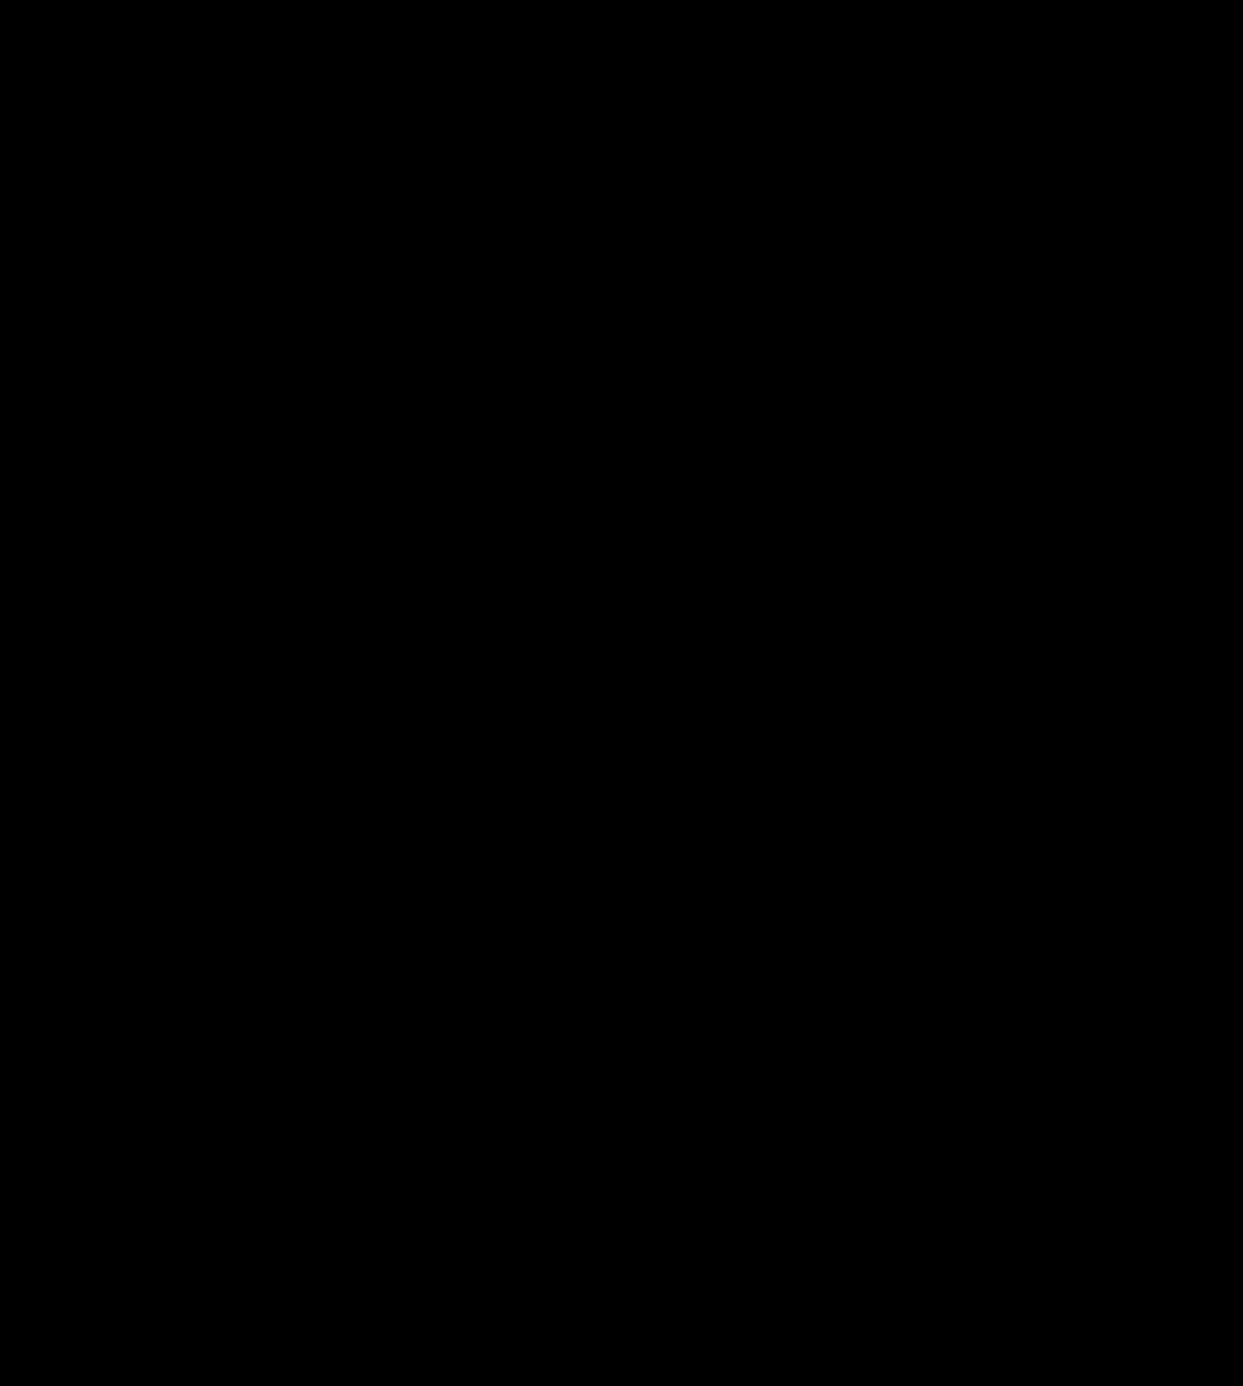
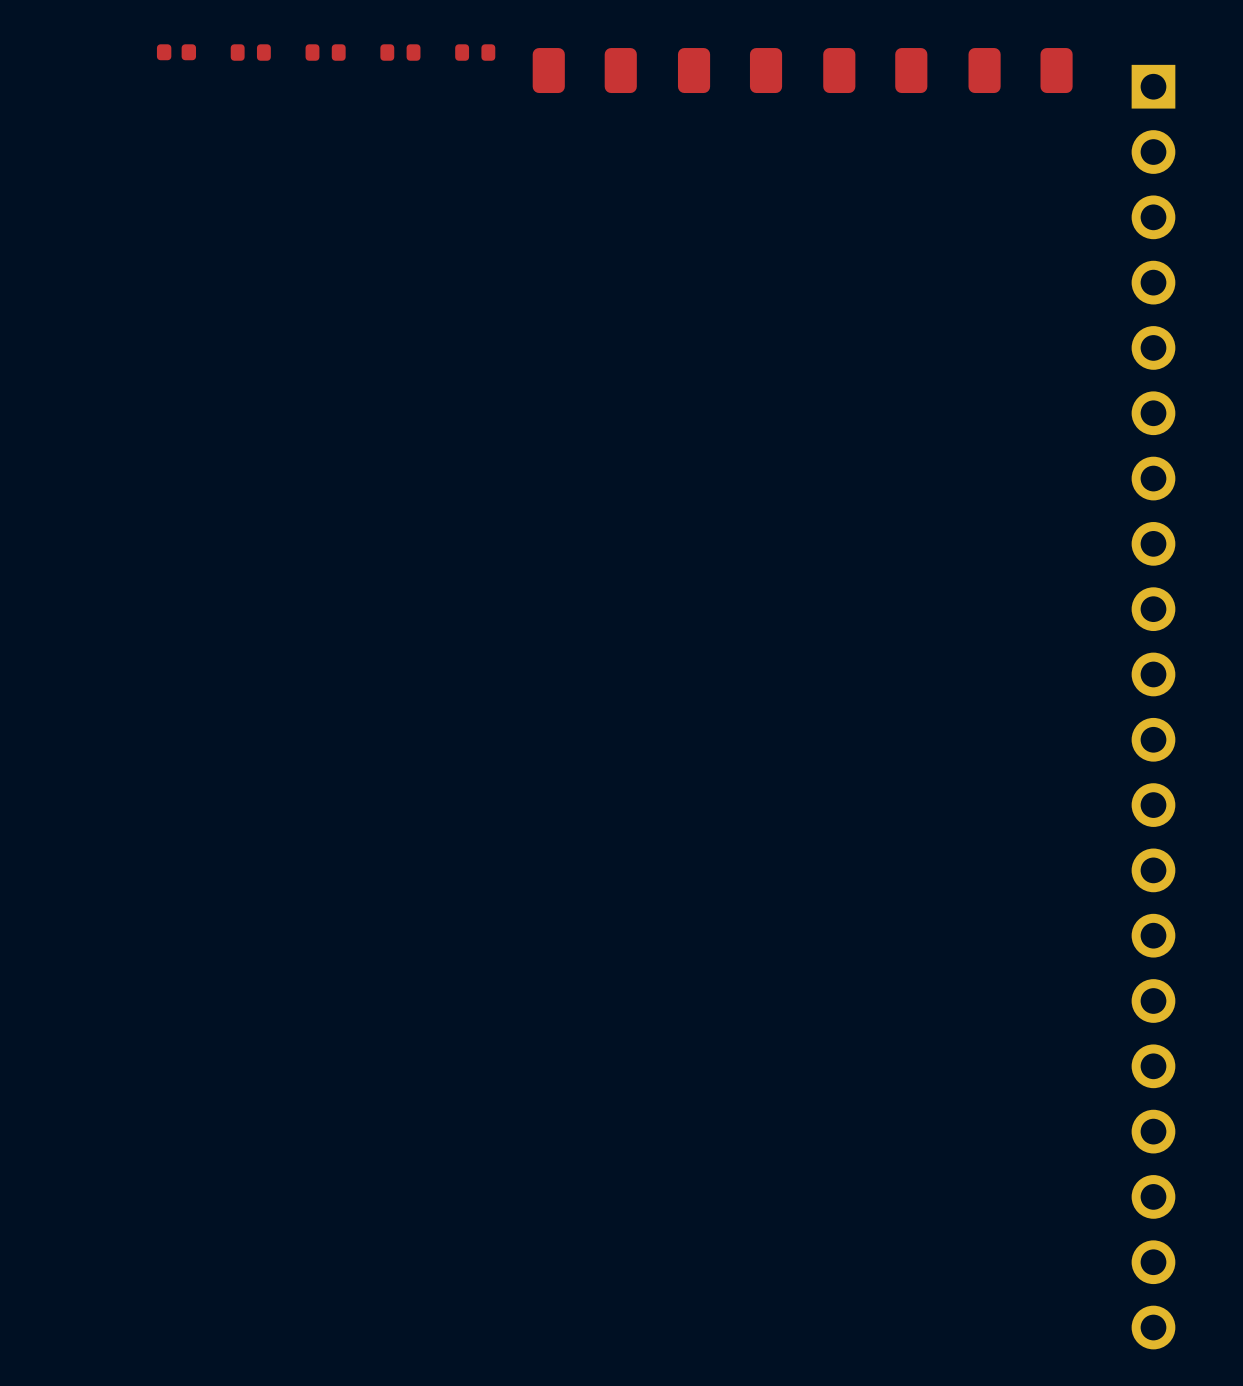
part: none -> (176, 52)
part: none -> (250, 52)
part: none -> (325, 52)
part: none -> (400, 52)
part: none -> (475, 52)
part: none -> (584, 70)
part: none -> (730, 70)
part: none -> (875, 70)
part: none -> (1020, 70)
part: none -> (1153, 707)

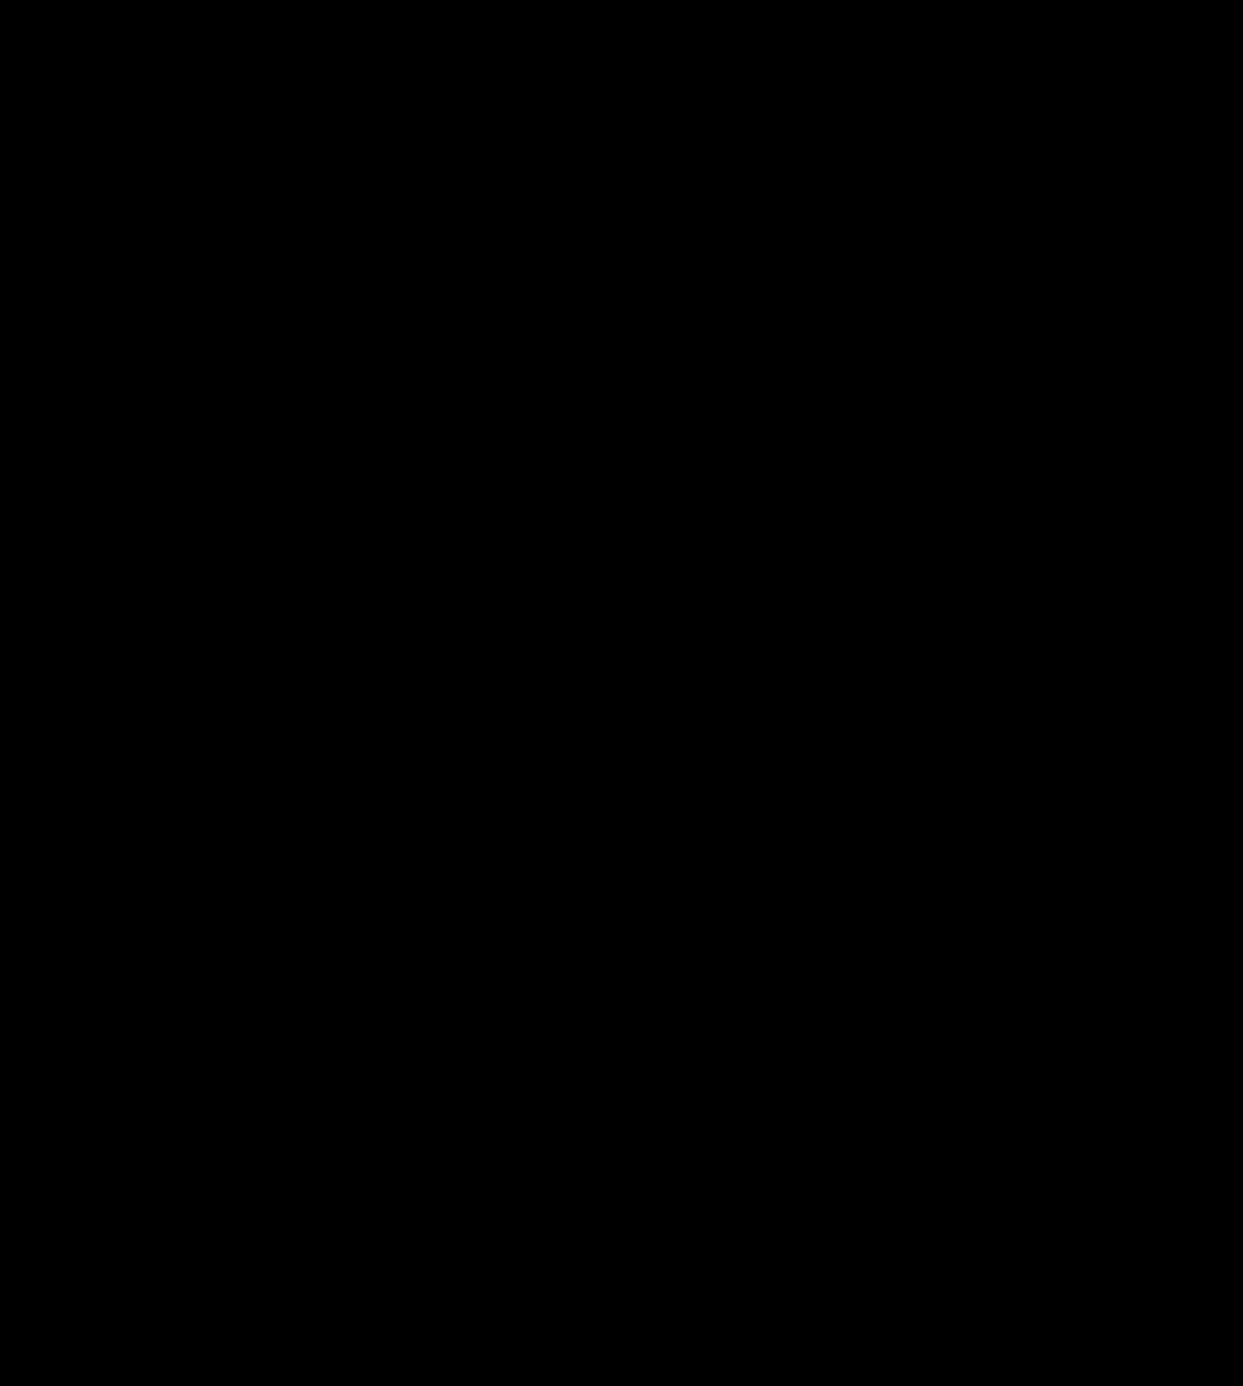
part: (176, 52) -> none
part: (250, 52) -> none
part: (325, 52) -> none
part: (400, 52) -> none
part: (475, 52) -> none
part: (584, 70) -> none
part: (730, 70) -> none
part: (875, 70) -> none
part: (1020, 70) -> none
part: (1153, 707) -> none

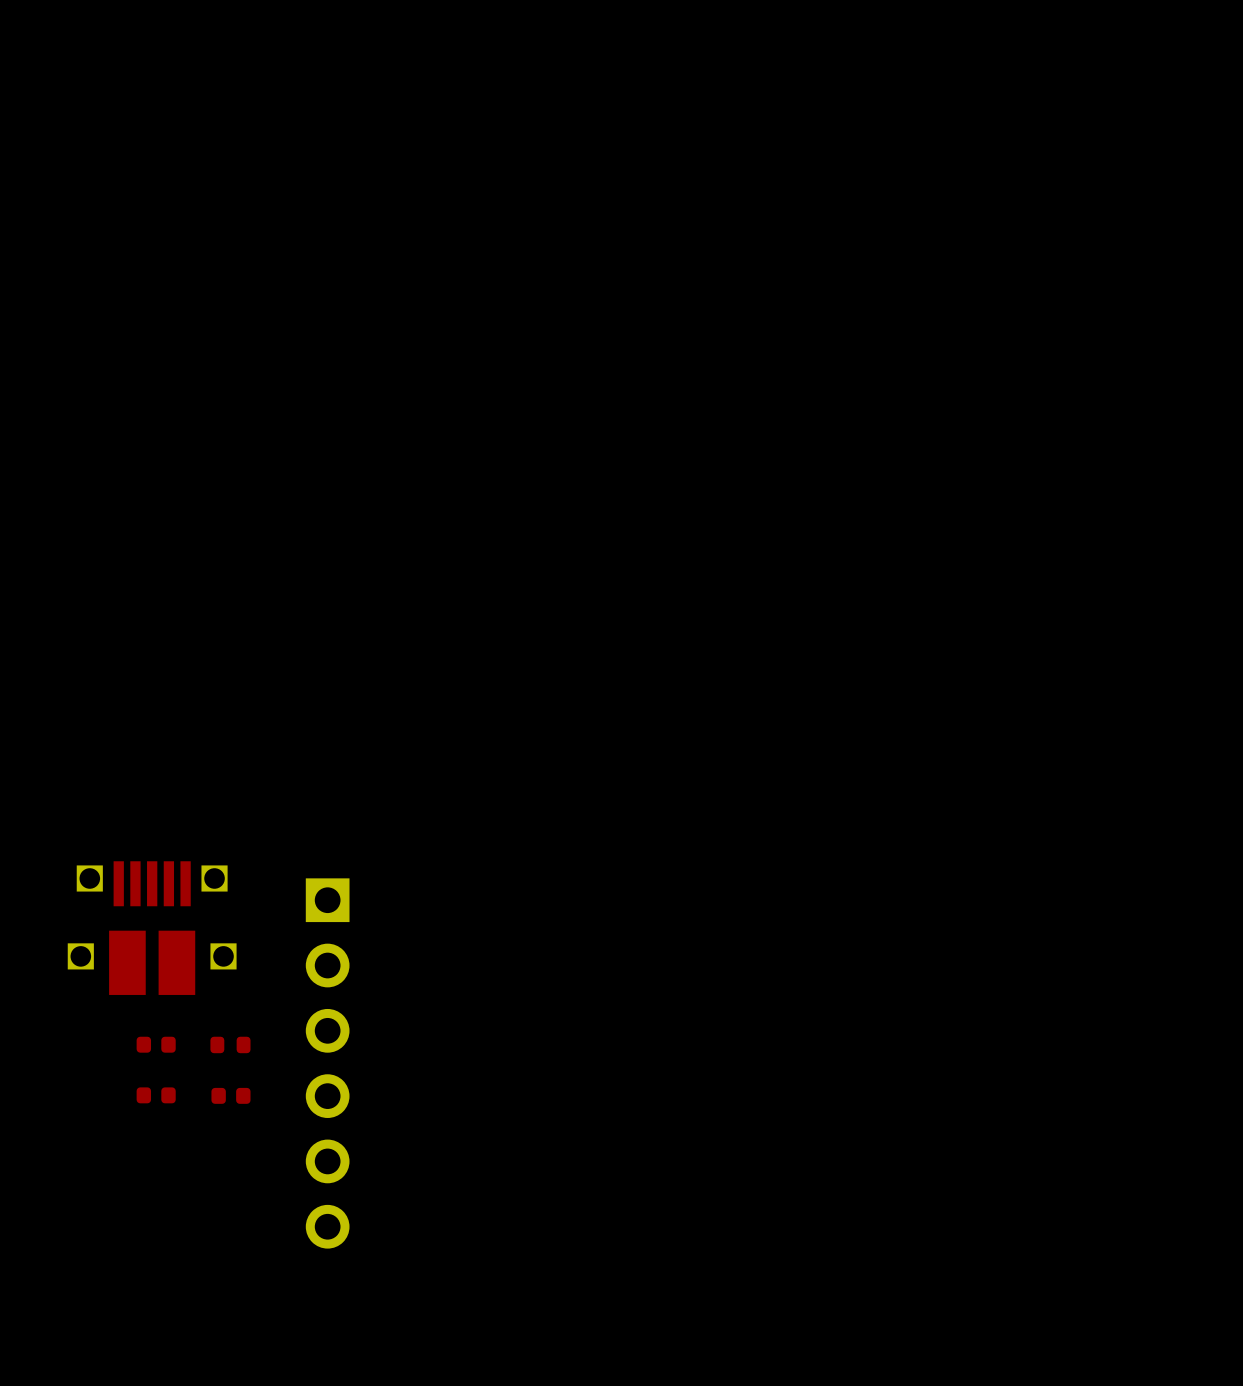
part: none -> (152, 928)
part: none -> (156, 1044)
part: none -> (230, 1044)
part: none -> (327, 1063)
part: none -> (156, 1095)
part: none -> (230, 1095)

